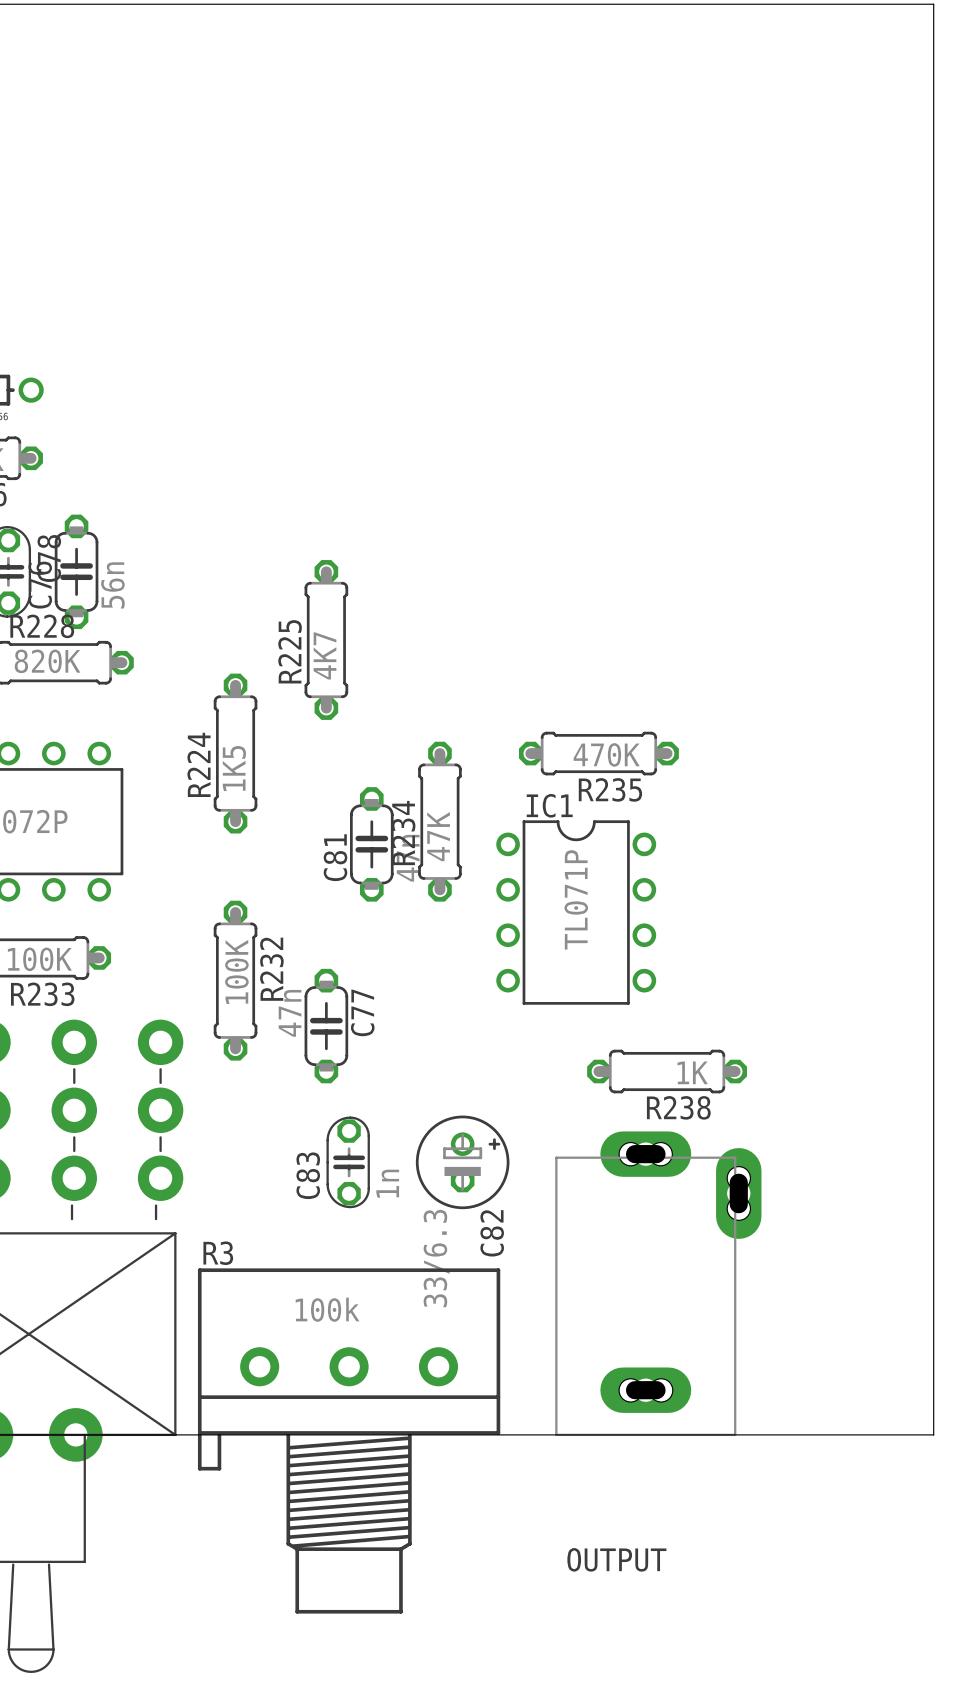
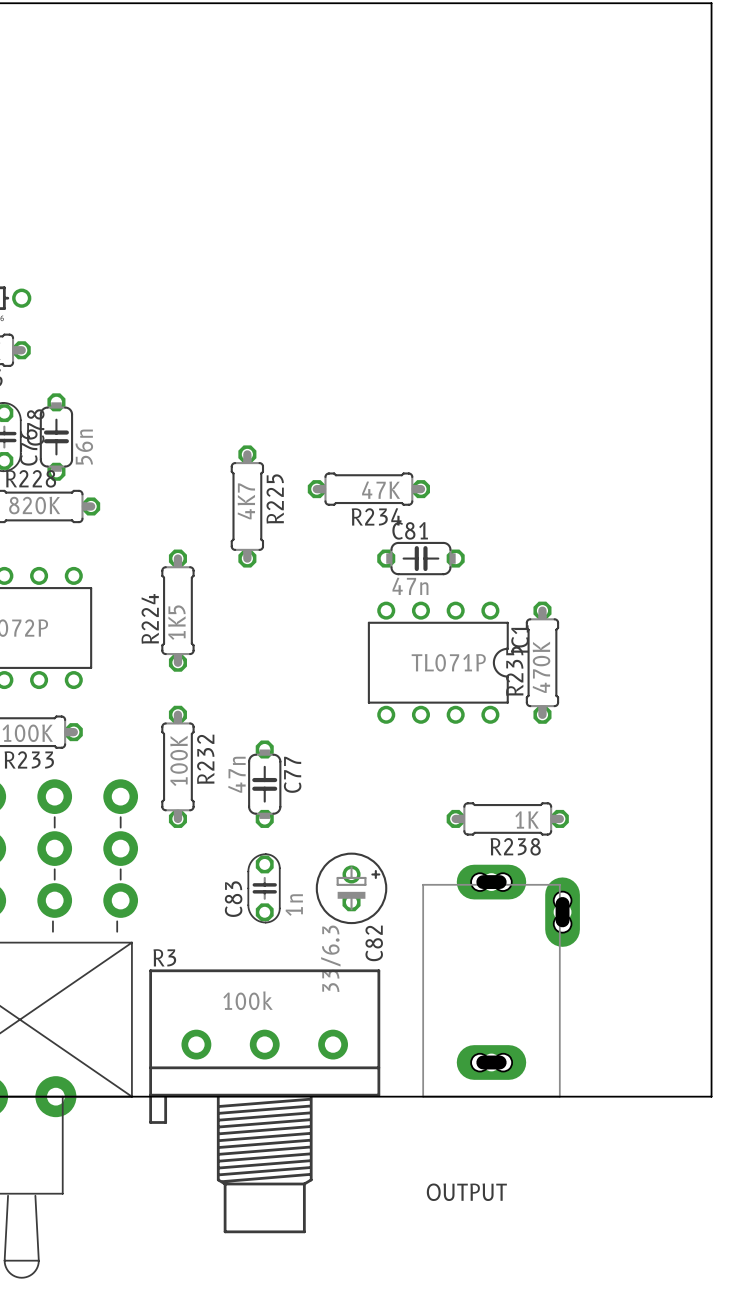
R225 position: (326, 639) -> (247, 506)
R225 name position: R225 (290, 651) -> R225 (275, 498)
R224 position: (235, 753) -> (177, 610)
R235 rotation: 0° (598, 753) -> 90° clockwise (542, 662)
R235 position: (598, 753) -> (542, 662)
R234 rotation: 0° (439, 821) -> 90° clockwise (368, 489)
R234 position: (439, 821) -> (368, 489)
R234 name position: R234 (403, 833) -> R234 (376, 516)
C81 rotation: 0° (371, 844) -> 90° clockwise (420, 558)
C81 position: (371, 844) -> (420, 558)
IC1 rotation: 0° (576, 912) -> 90° clockwise (438, 662)
R232 position: (235, 980) -> (177, 766)
C77 position: (326, 1026) -> (264, 784)

